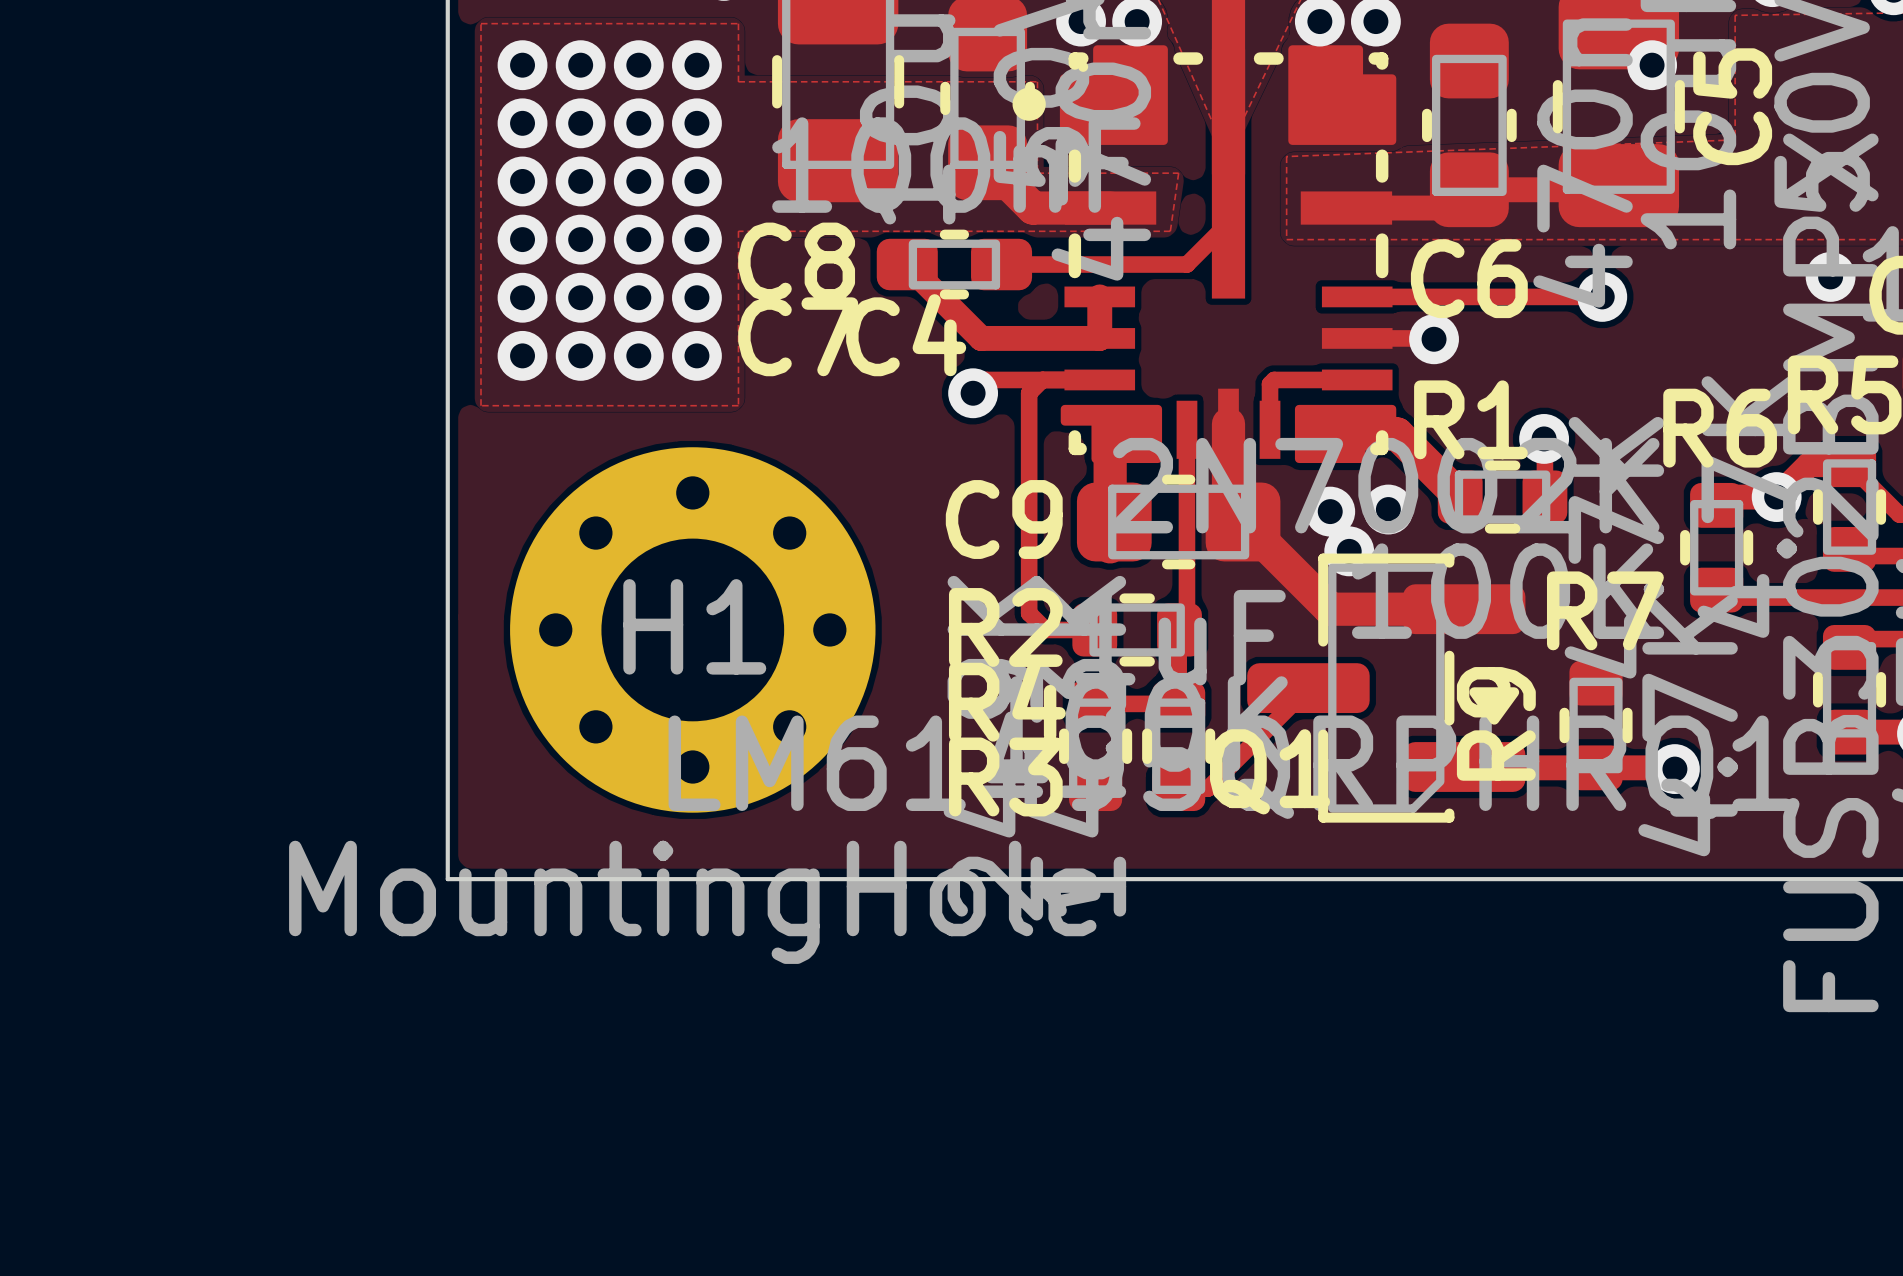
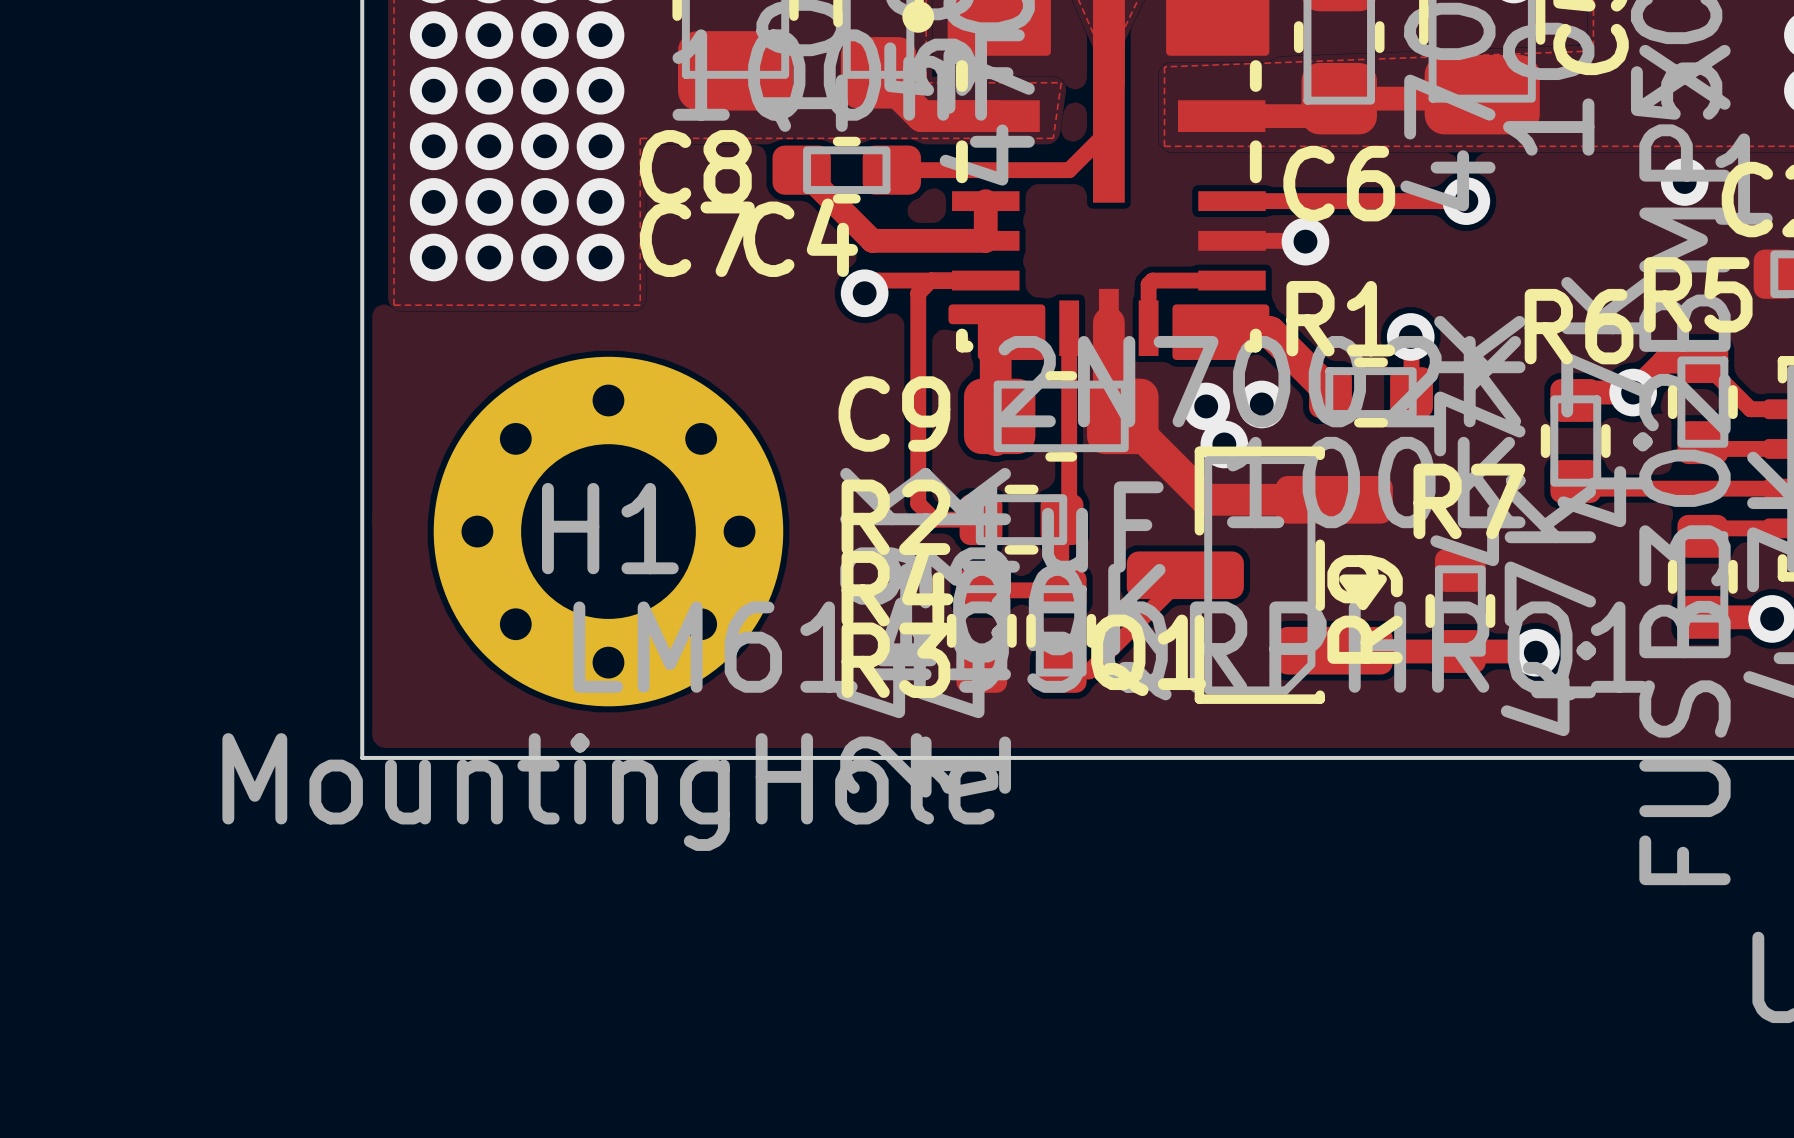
H1 position: (692, 629) -> (608, 531)

